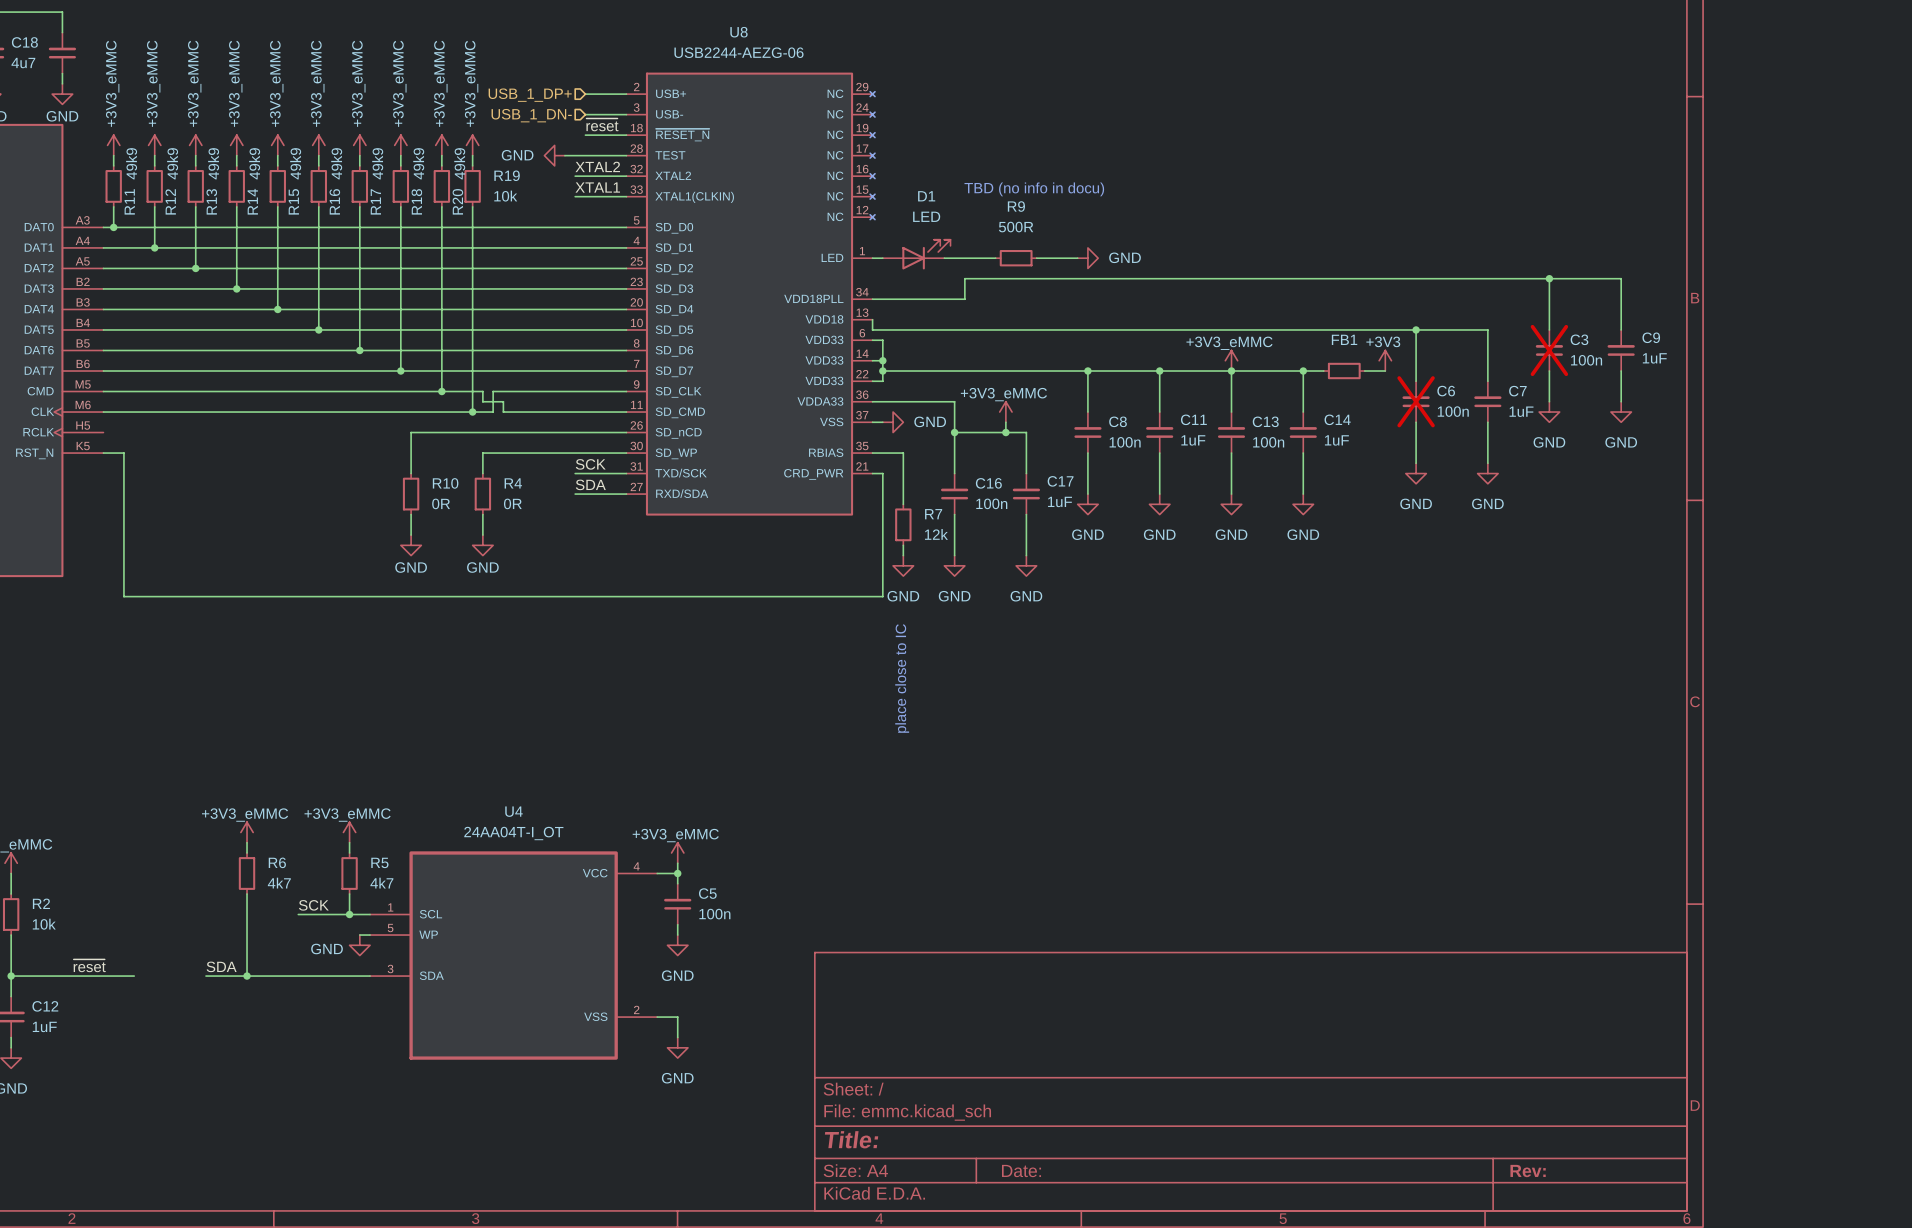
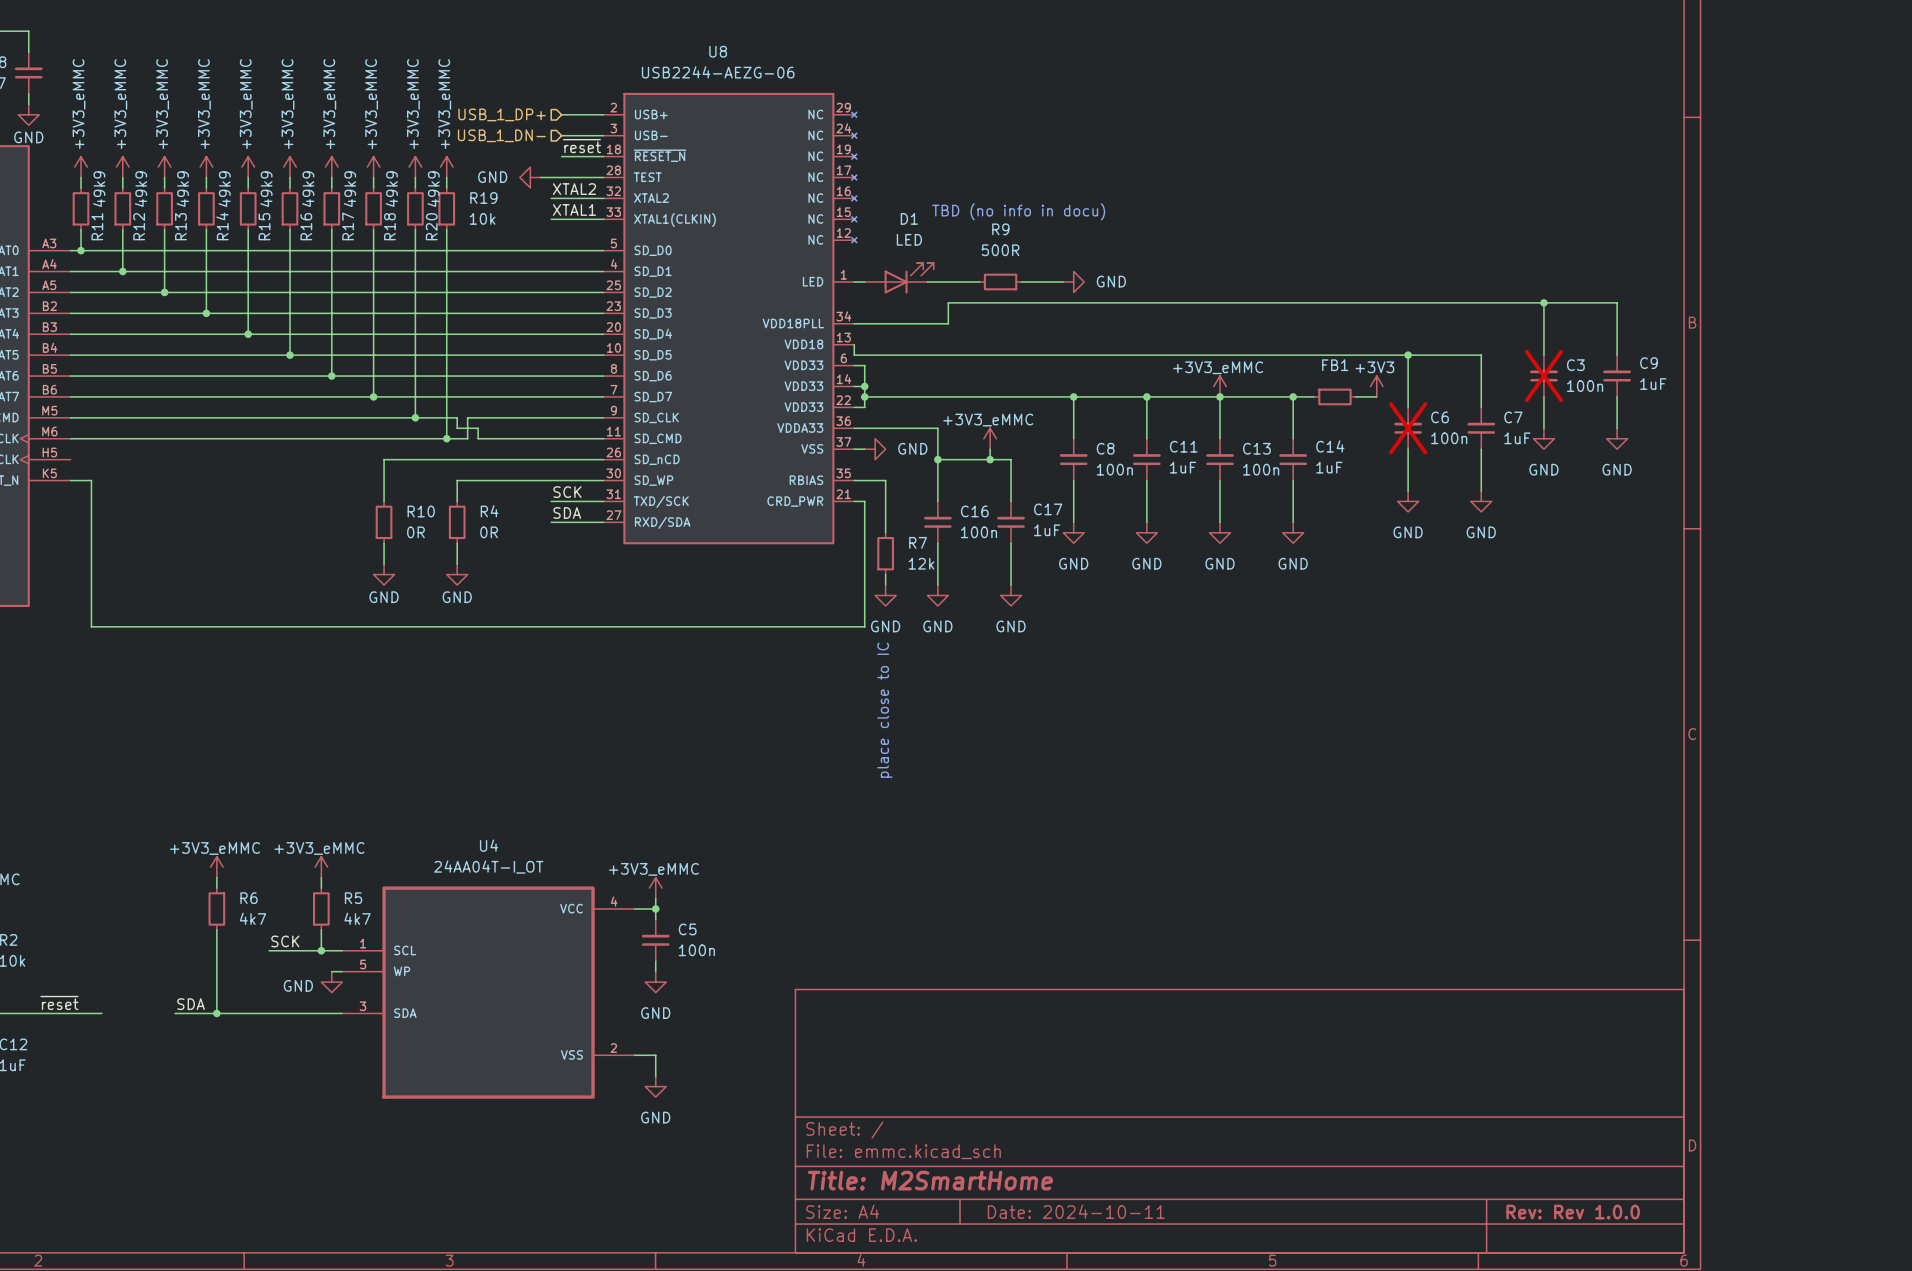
title block: Title: (851, 1139) -> Title: M2SmartHome (930, 1180)
title block: Date: (1021, 1171) -> Date: 2024-10-11 (1076, 1211)
title block: Rev: (1528, 1171) -> Rev: Rev 1.0.0 (1573, 1212)

